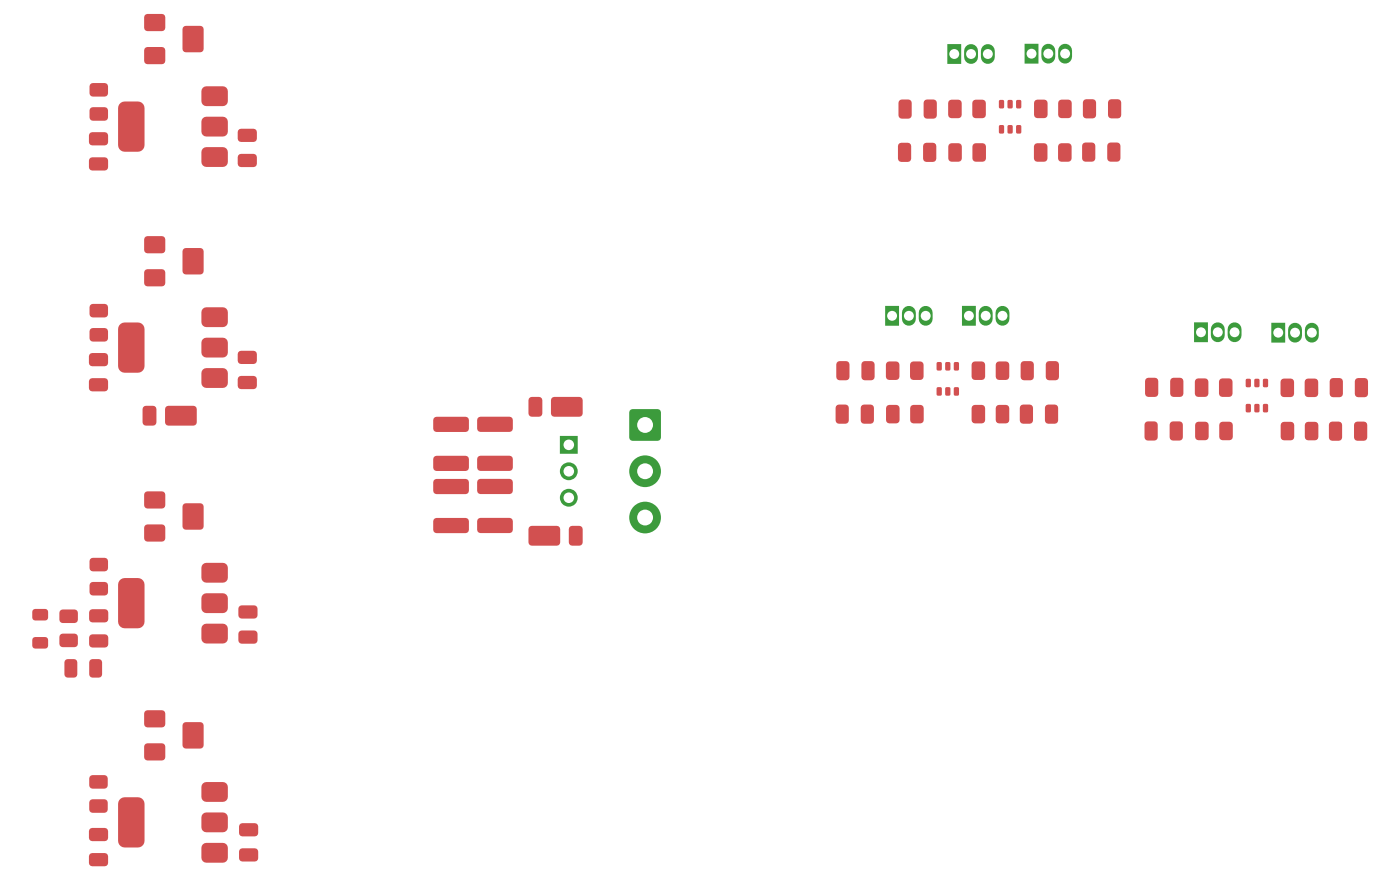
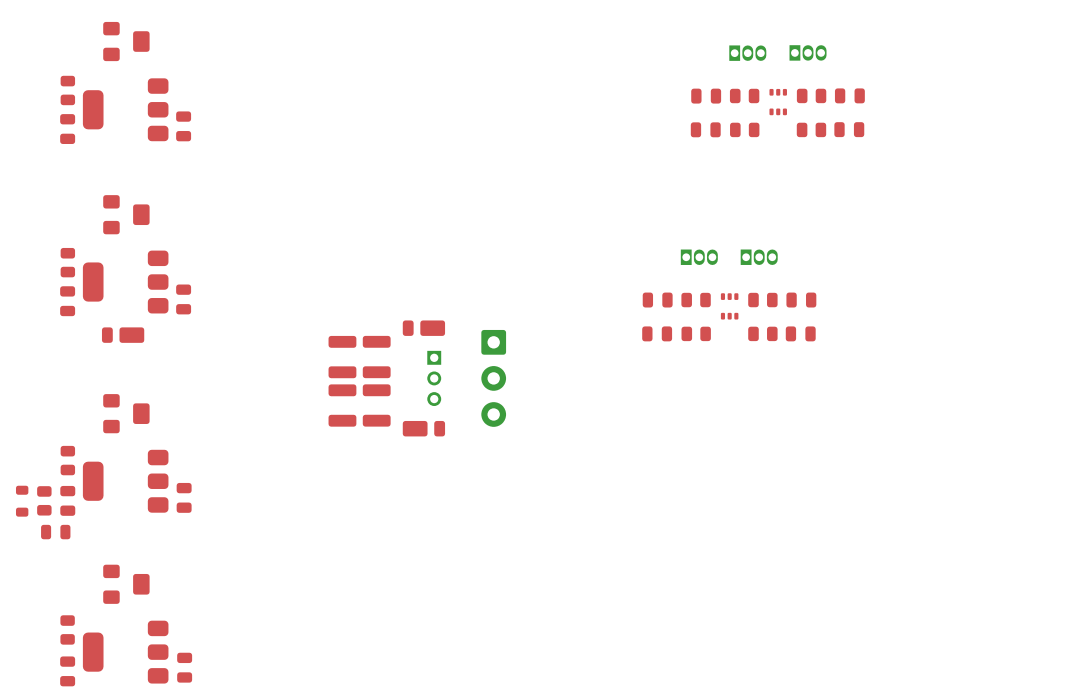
part: (1217, 332) -> none
part: (1295, 332) -> none
part: (1164, 387) -> none
part: (1213, 387) -> none
part: (1299, 387) -> none
part: (1348, 387) -> none
part: (1256, 395) -> none
part: (1163, 430) -> none
part: (1213, 430) -> none
part: (1299, 431) -> none
part: (1348, 431) -> none

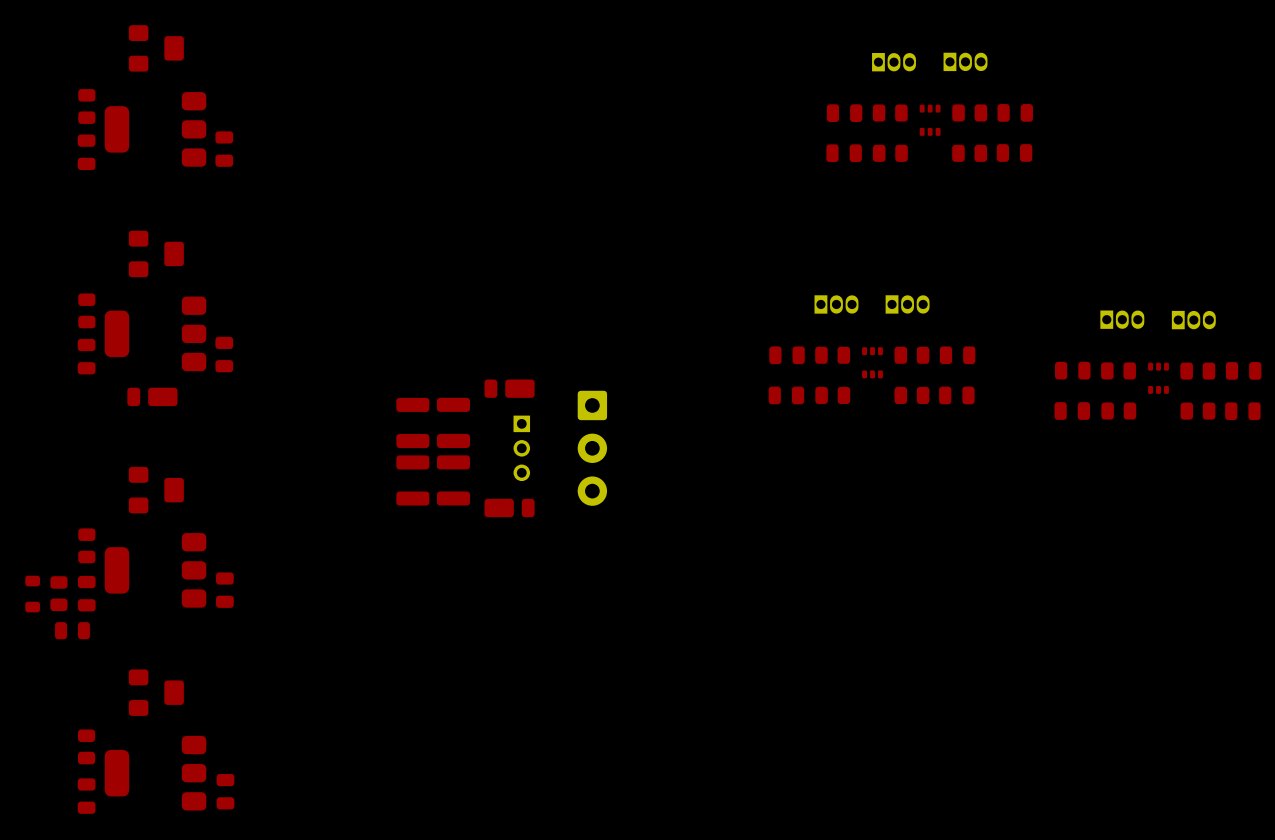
part: none -> (1122, 319)
part: none -> (1193, 320)
part: none -> (1072, 370)
part: none -> (1118, 370)
part: none -> (1197, 371)
part: none -> (1243, 370)
part: none -> (1158, 378)
part: none -> (1072, 411)
part: none -> (1118, 411)
part: none -> (1197, 411)
part: none -> (1242, 411)

